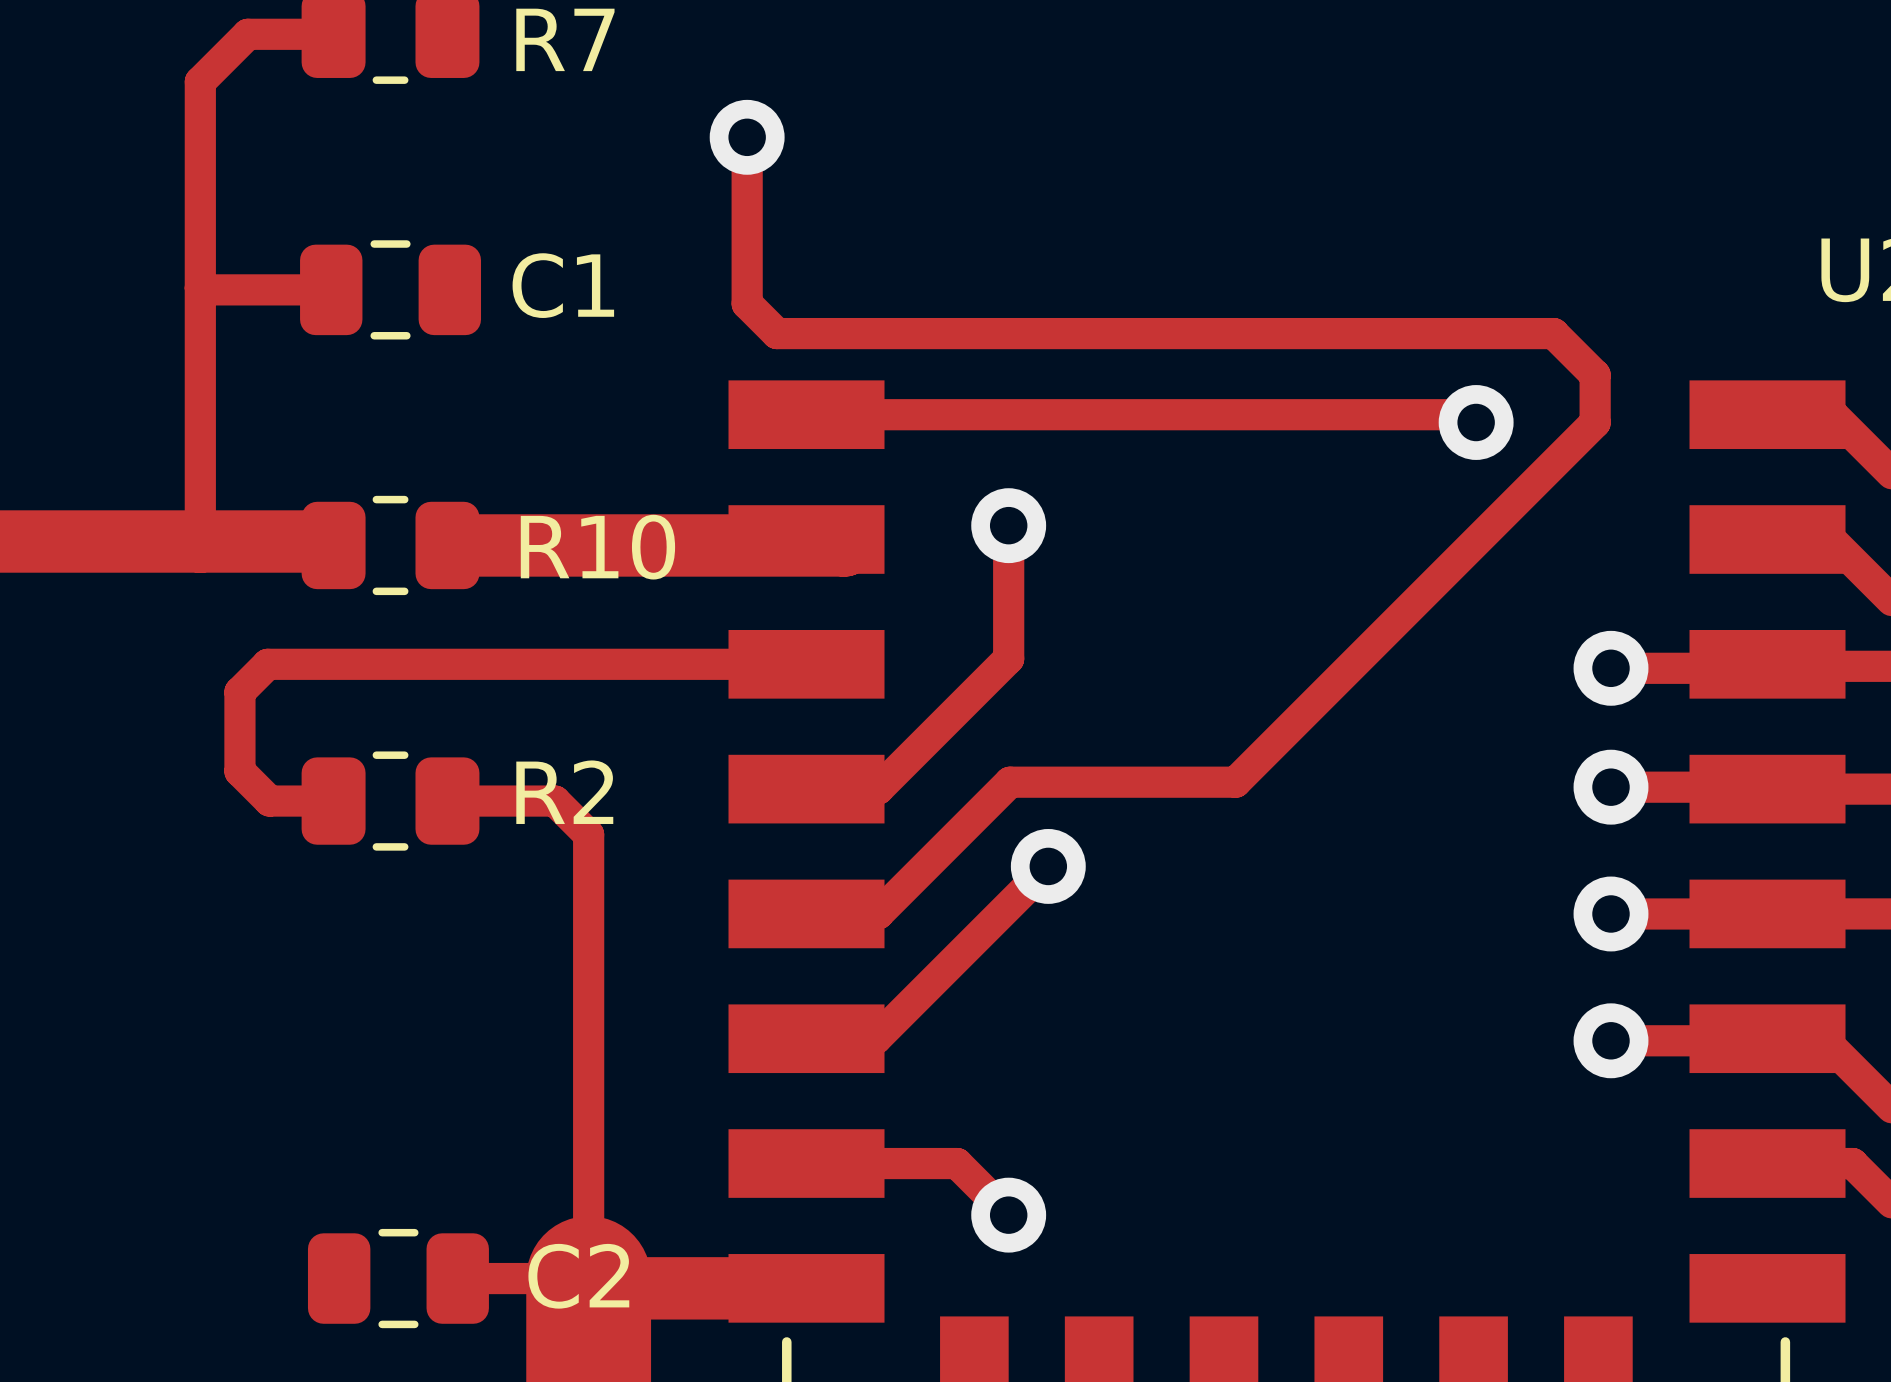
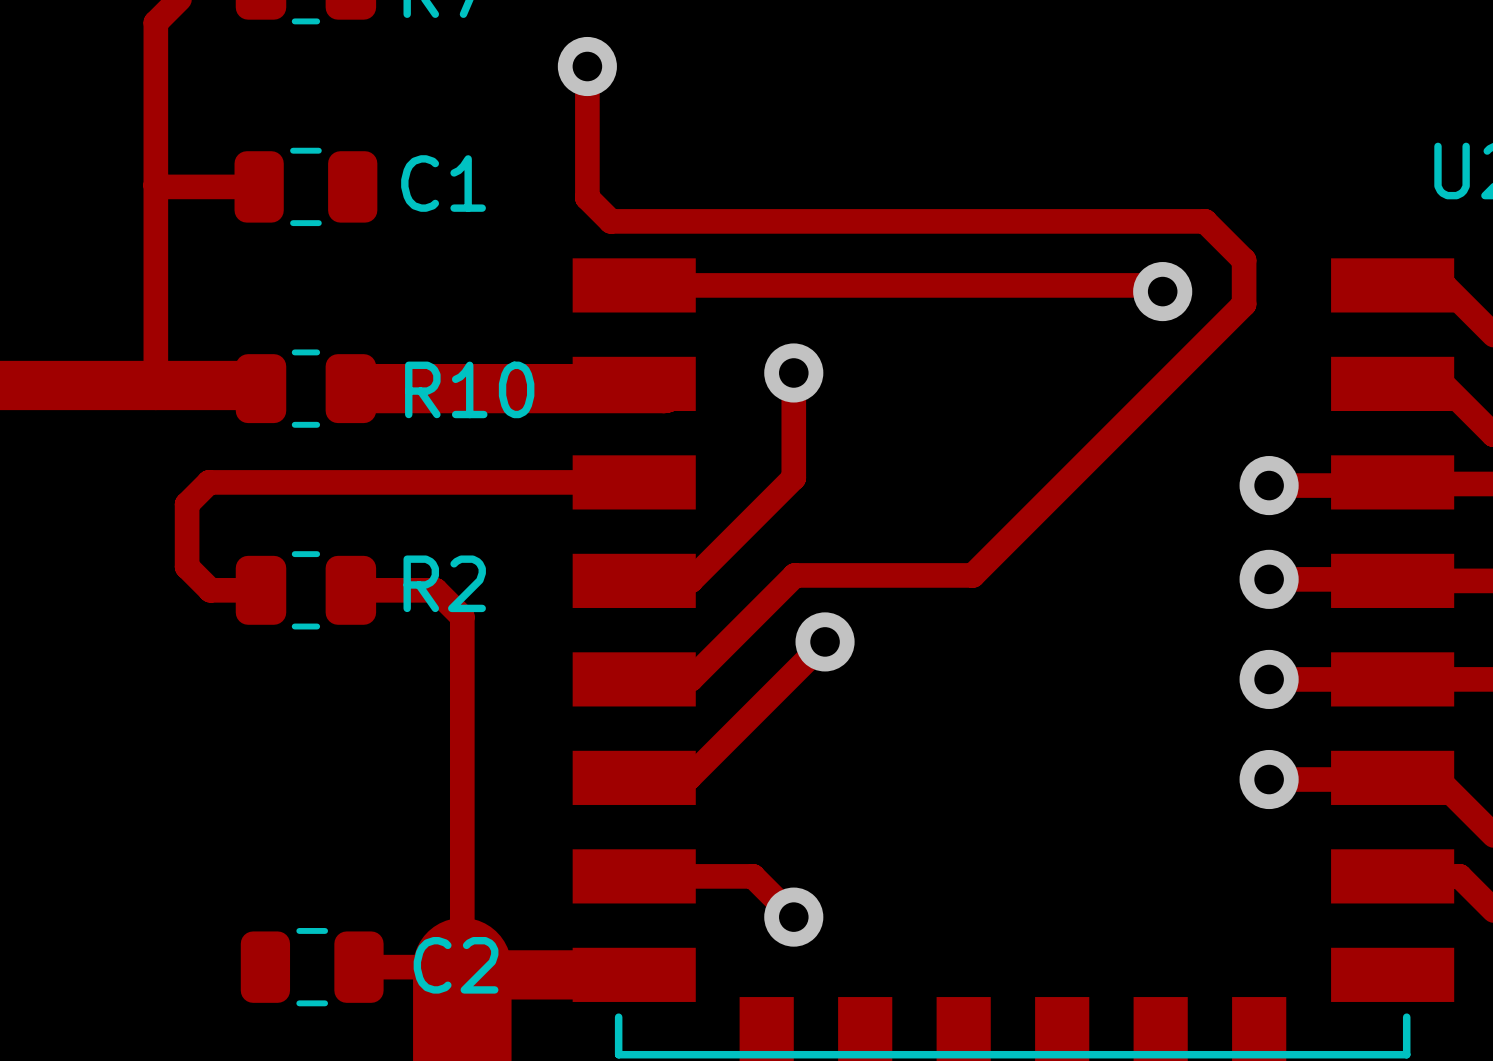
track: (1529, 333) (1553, 333) (1595, 375) (1595, 422) (1579, 438) -> (1205, 221) (1244, 260) (1244, 304)

